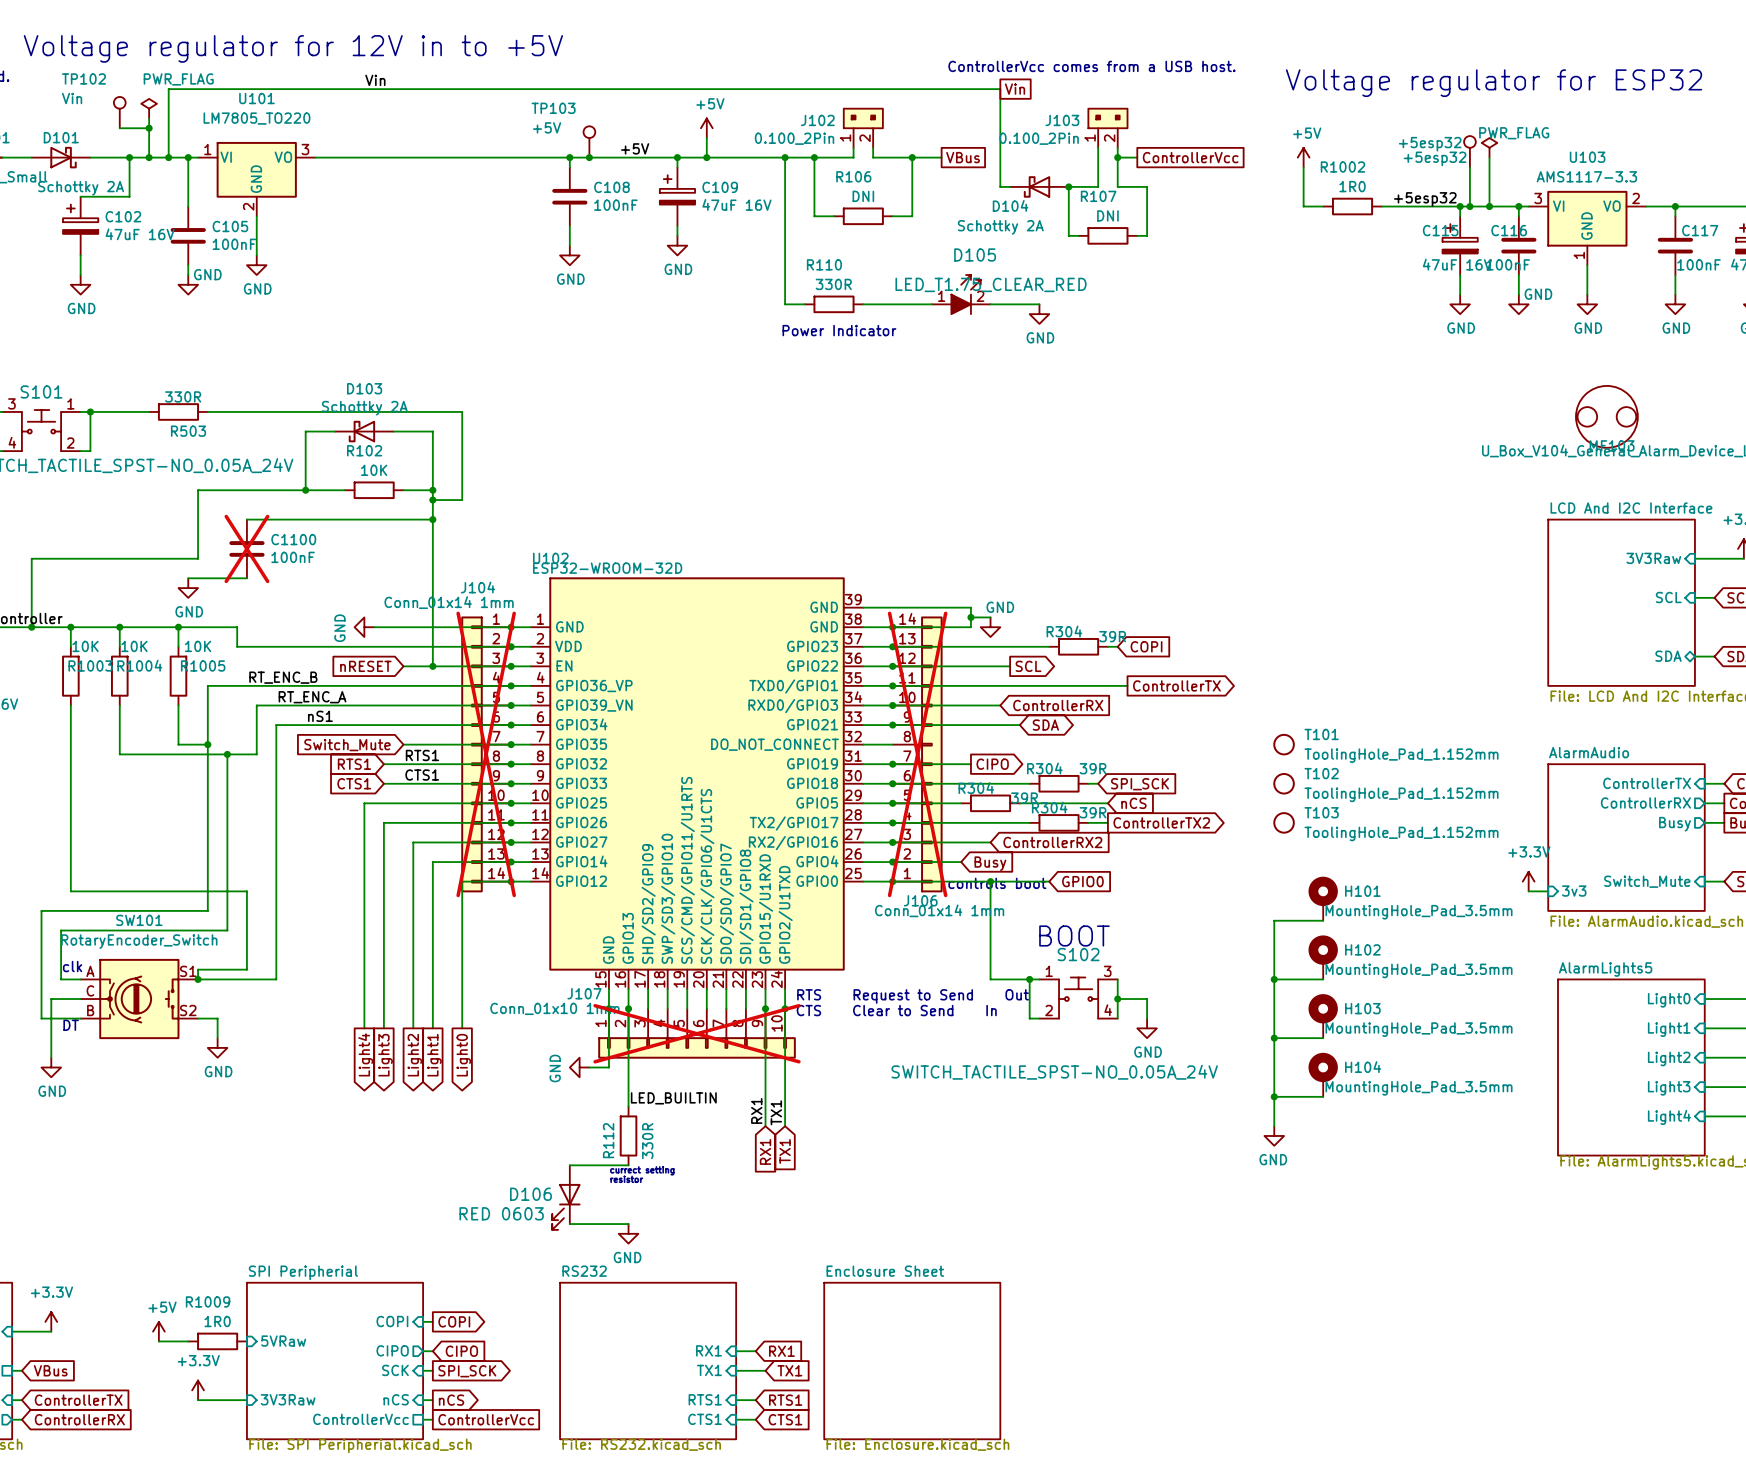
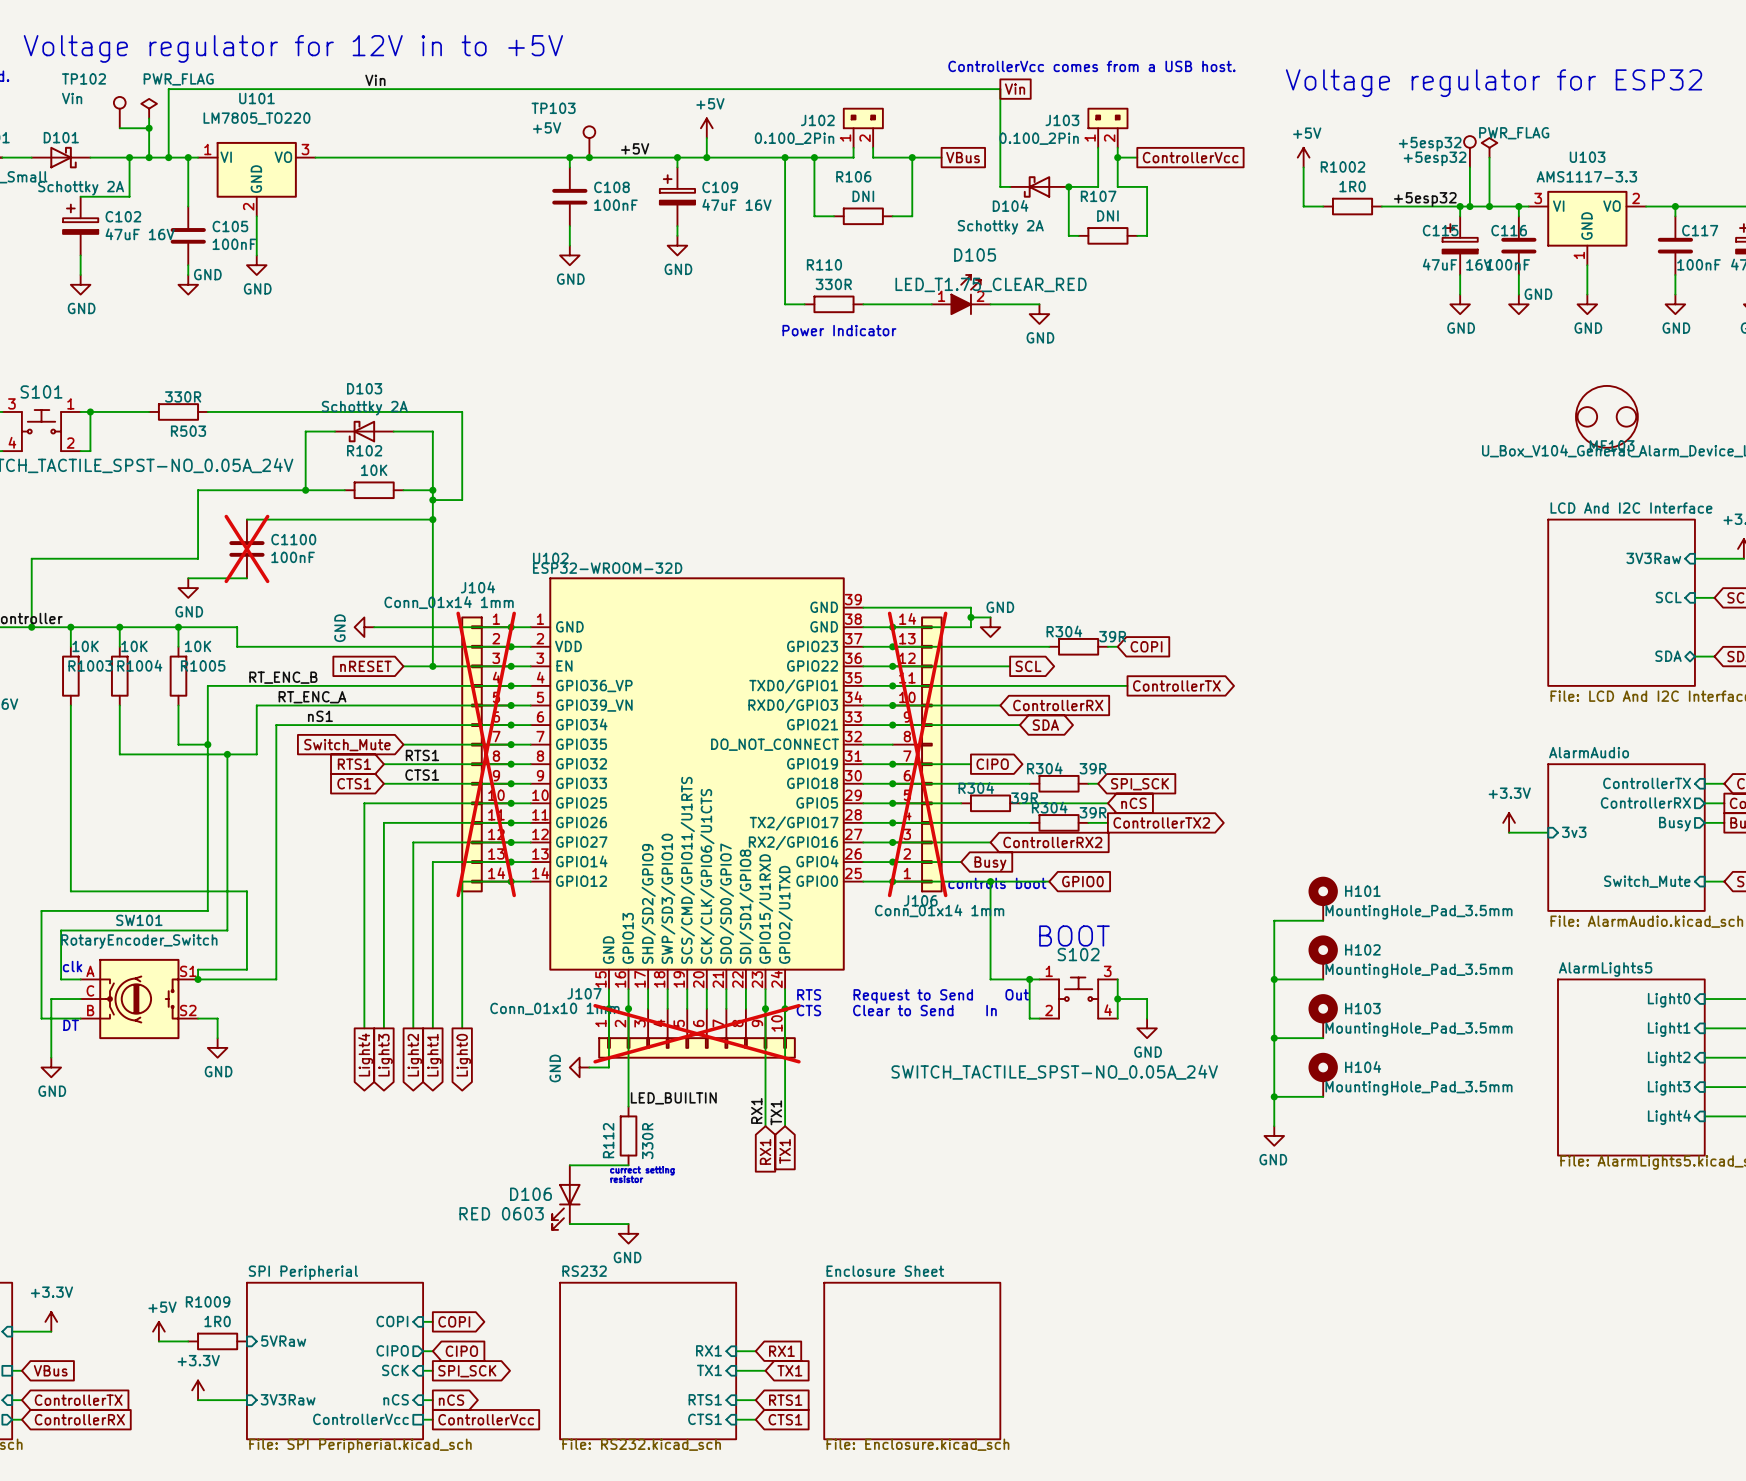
T101: ToolingHole_Pad_1.152mm (1284, 744) -> none
T102: ToolingHole_Pad_1.152mm (1284, 783) -> none
T103: ToolingHole_Pad_1.152mm (1284, 822) -> none
wire: none -> (1509, 832) (1548, 832)
power symbol position: +3.3V (1528, 881) -> +3.3V (1509, 822)
wire: (1528, 891) (1548, 891) -> none
sheet pin position: 3v3 (1574, 891) -> 3v3 (1574, 832)

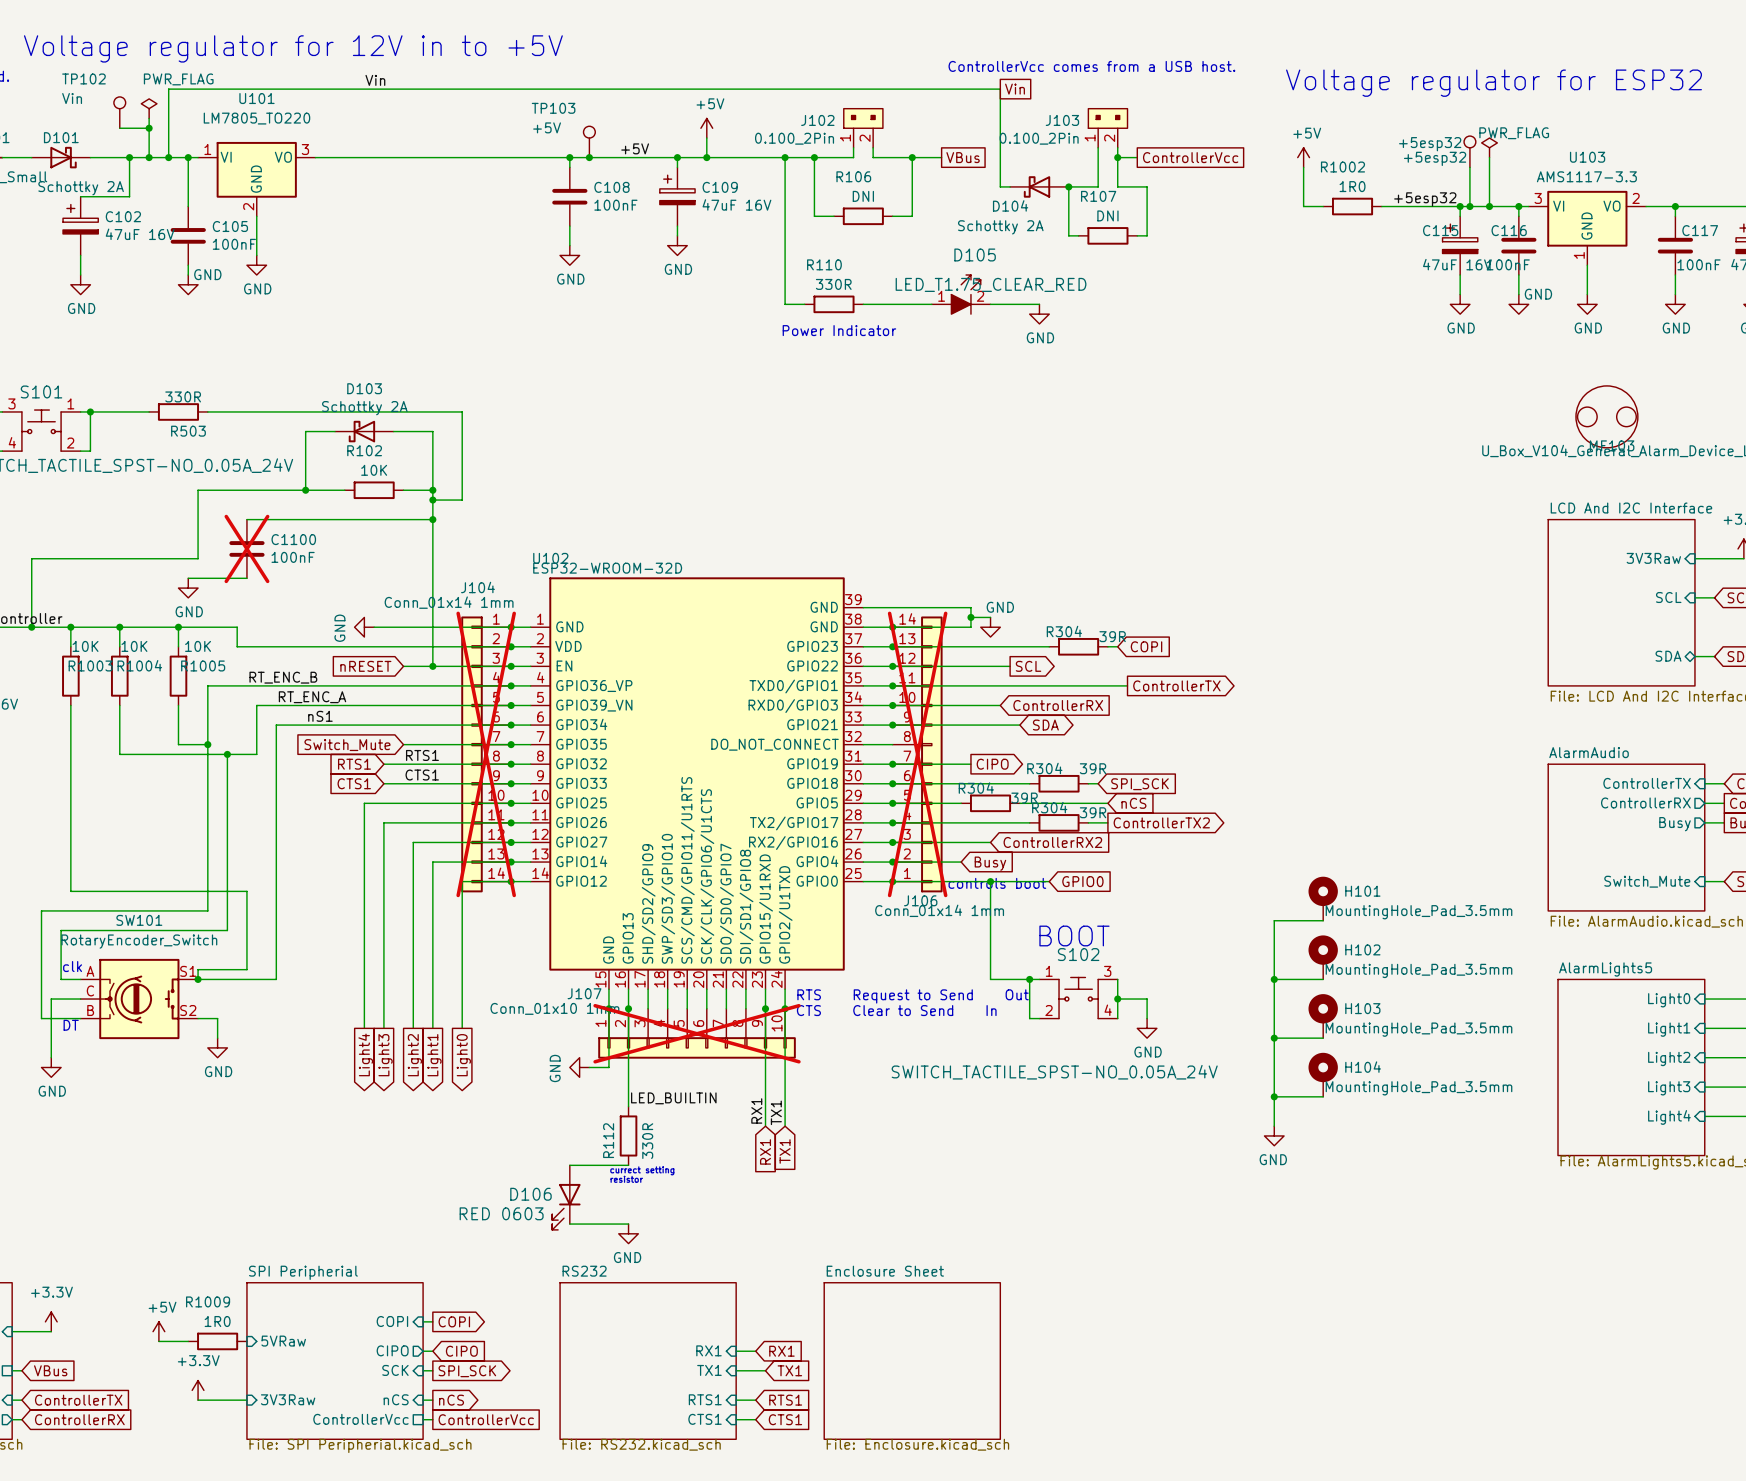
power symbol: +3.3V (1509, 822) -> none
wire: (1509, 832) (1548, 832) -> none
sheet pin: 3v3 (1574, 832) -> none

